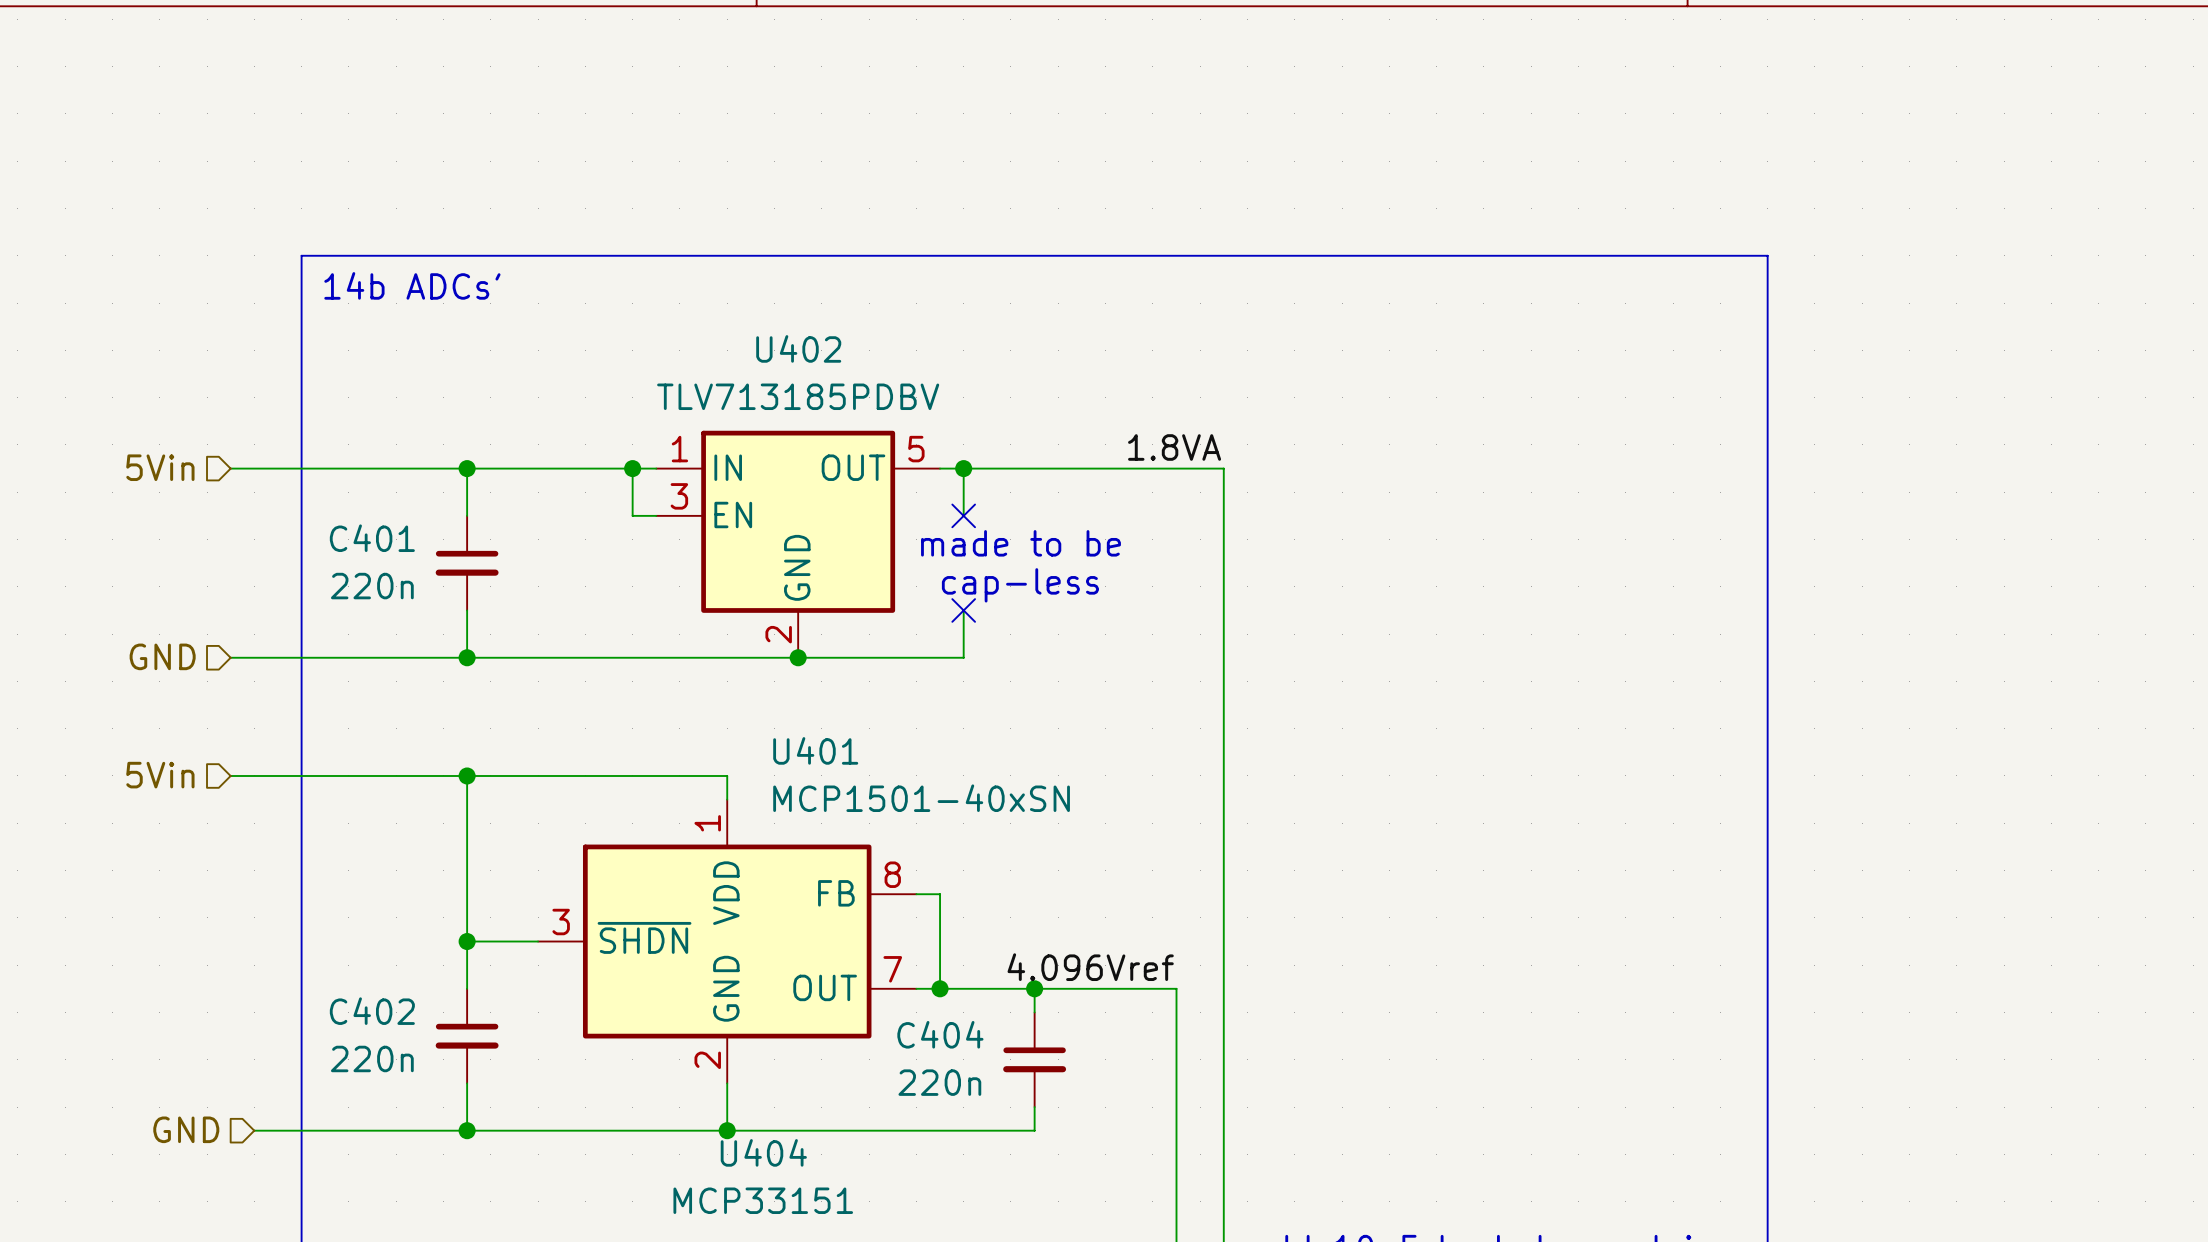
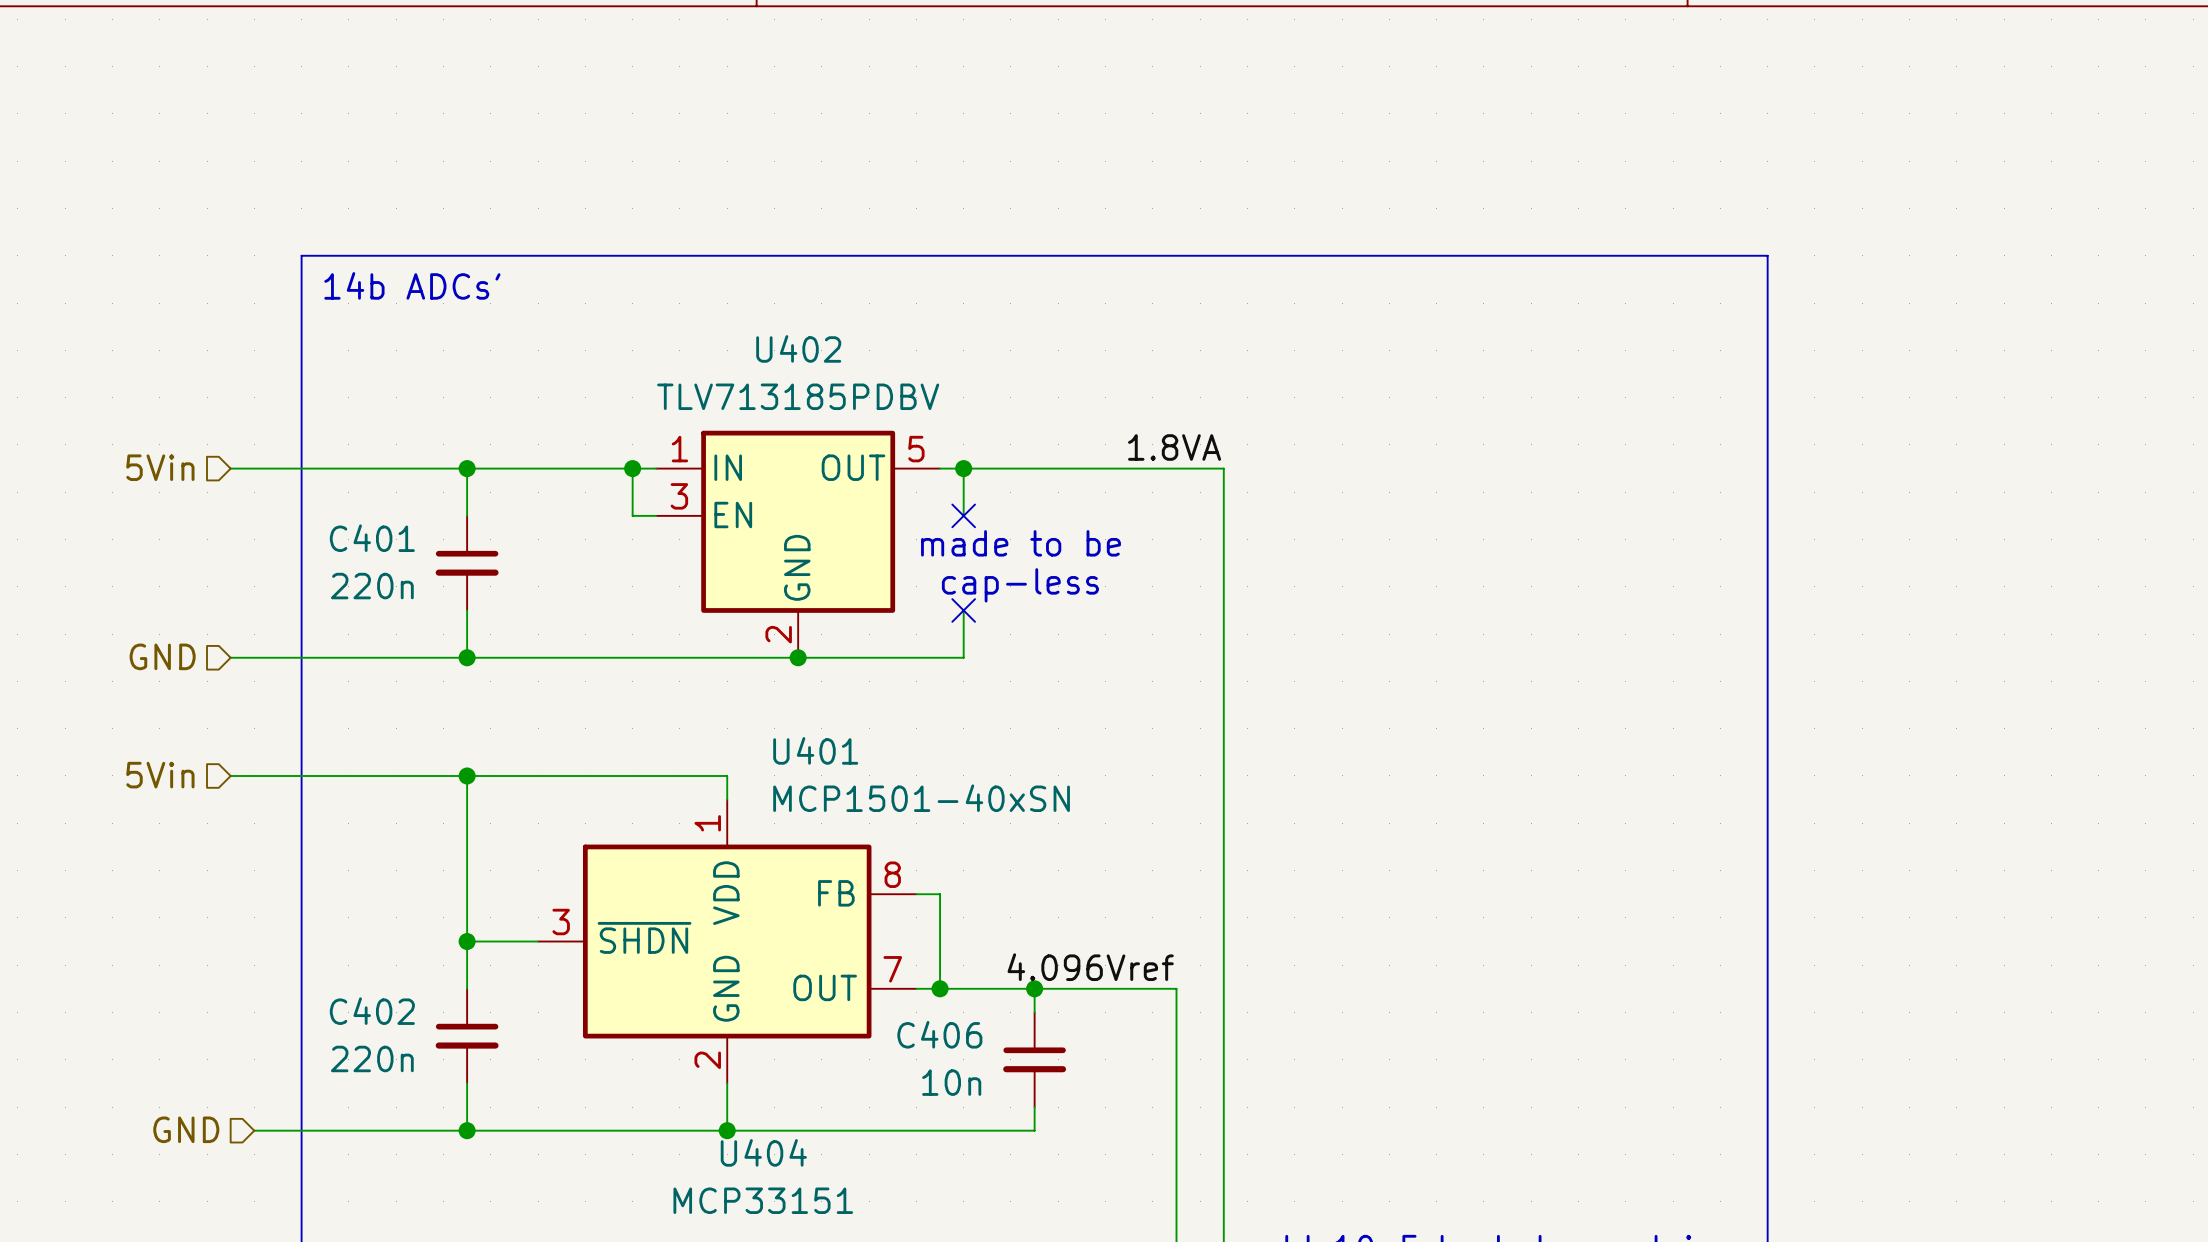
C404 name: C404 (940, 1034) -> C406 (939, 1034)
C404 value: 220n (939, 1082) -> 10n (951, 1082)

